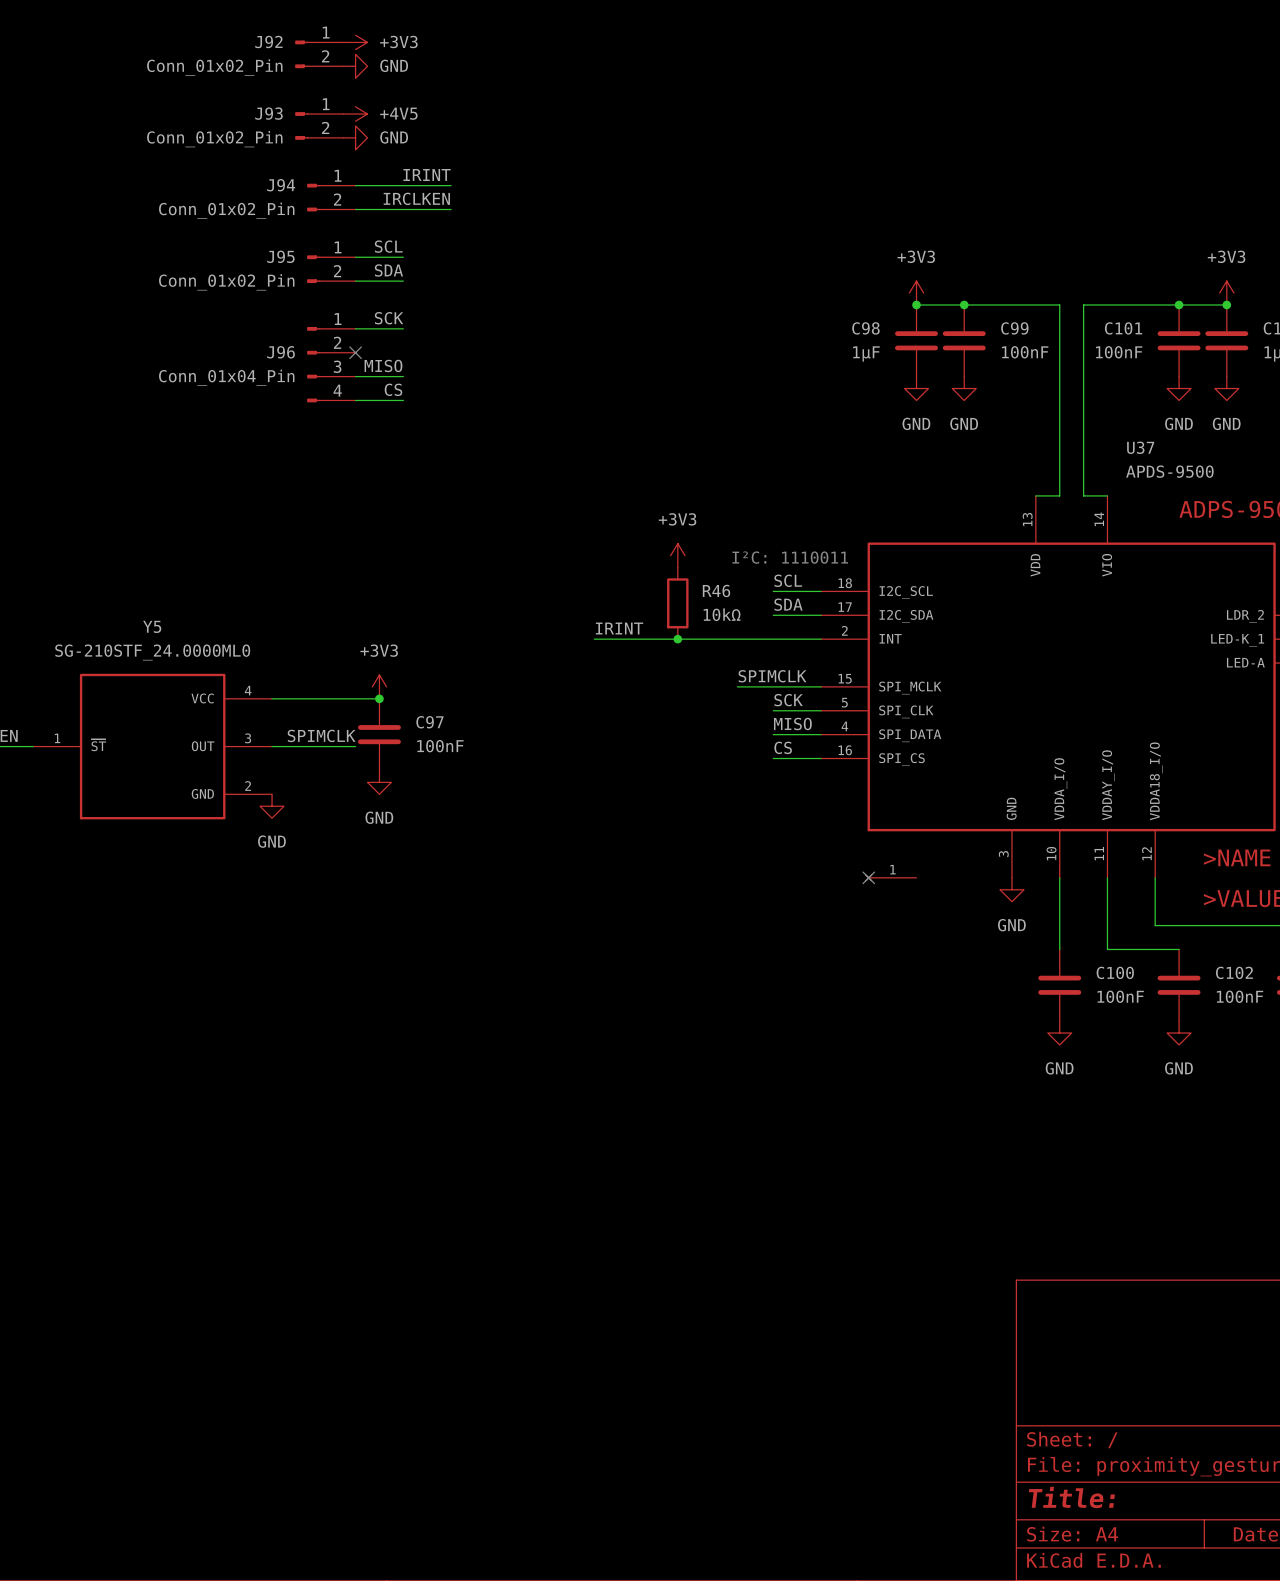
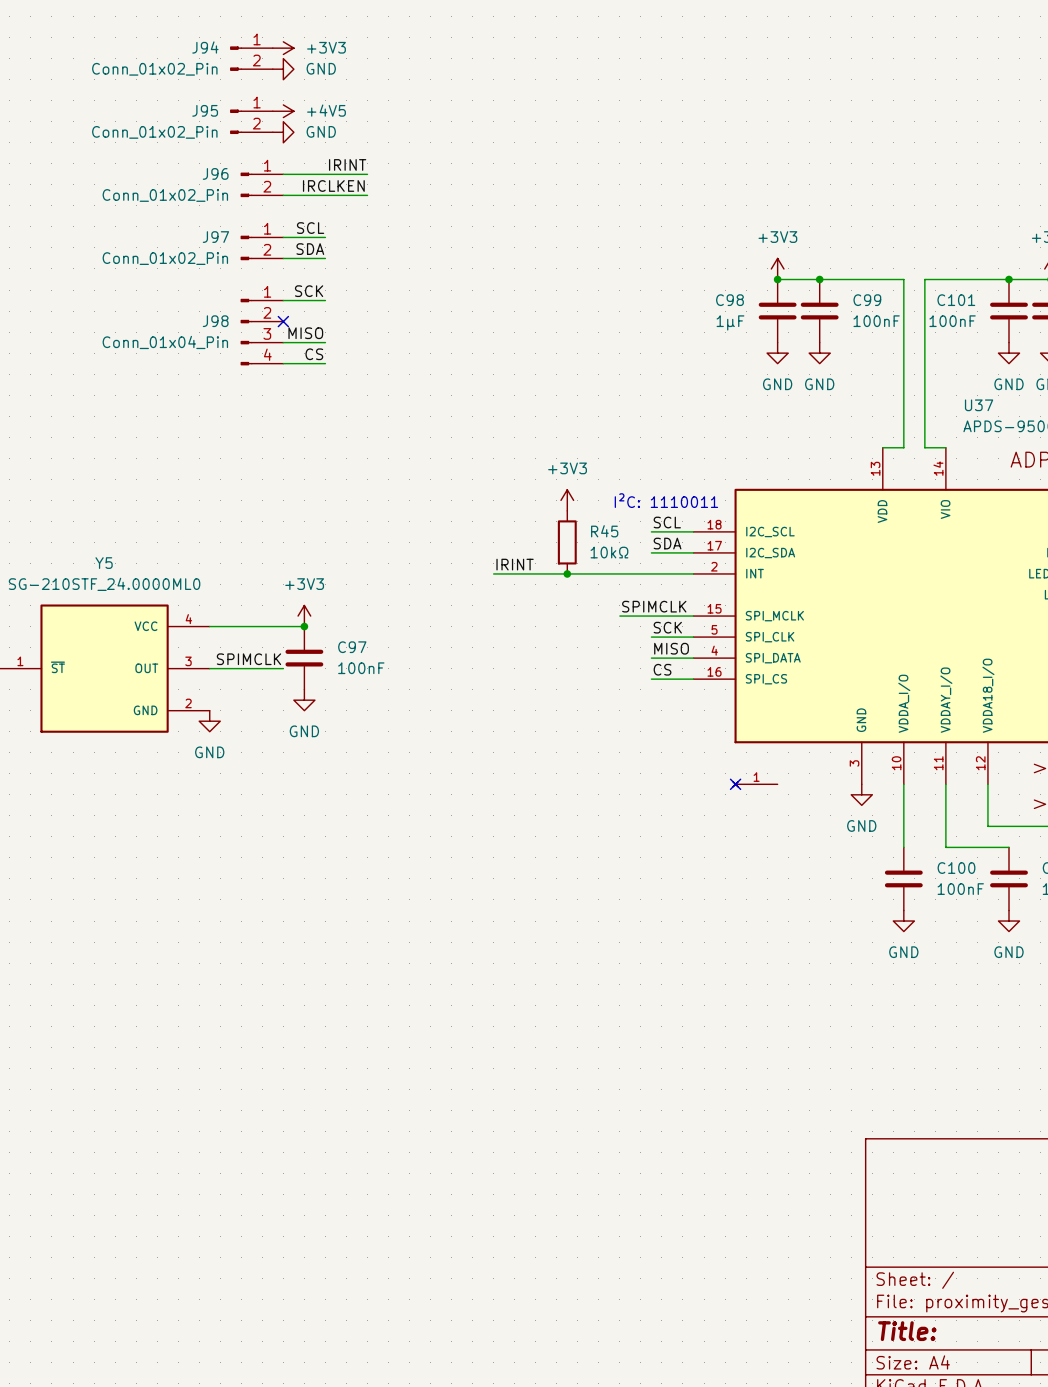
J92 name: J92 (268, 41) -> J94 (205, 47)
J93 name: J93 (269, 113) -> J95 (205, 110)
J94 name: J94 (281, 185) -> J96 (215, 173)
J95 name: J95 (280, 256) -> J97 (215, 237)
J96 name: J96 (281, 352) -> J98 (215, 321)
R46 name: R46 (716, 590) -> R45 (604, 531)

